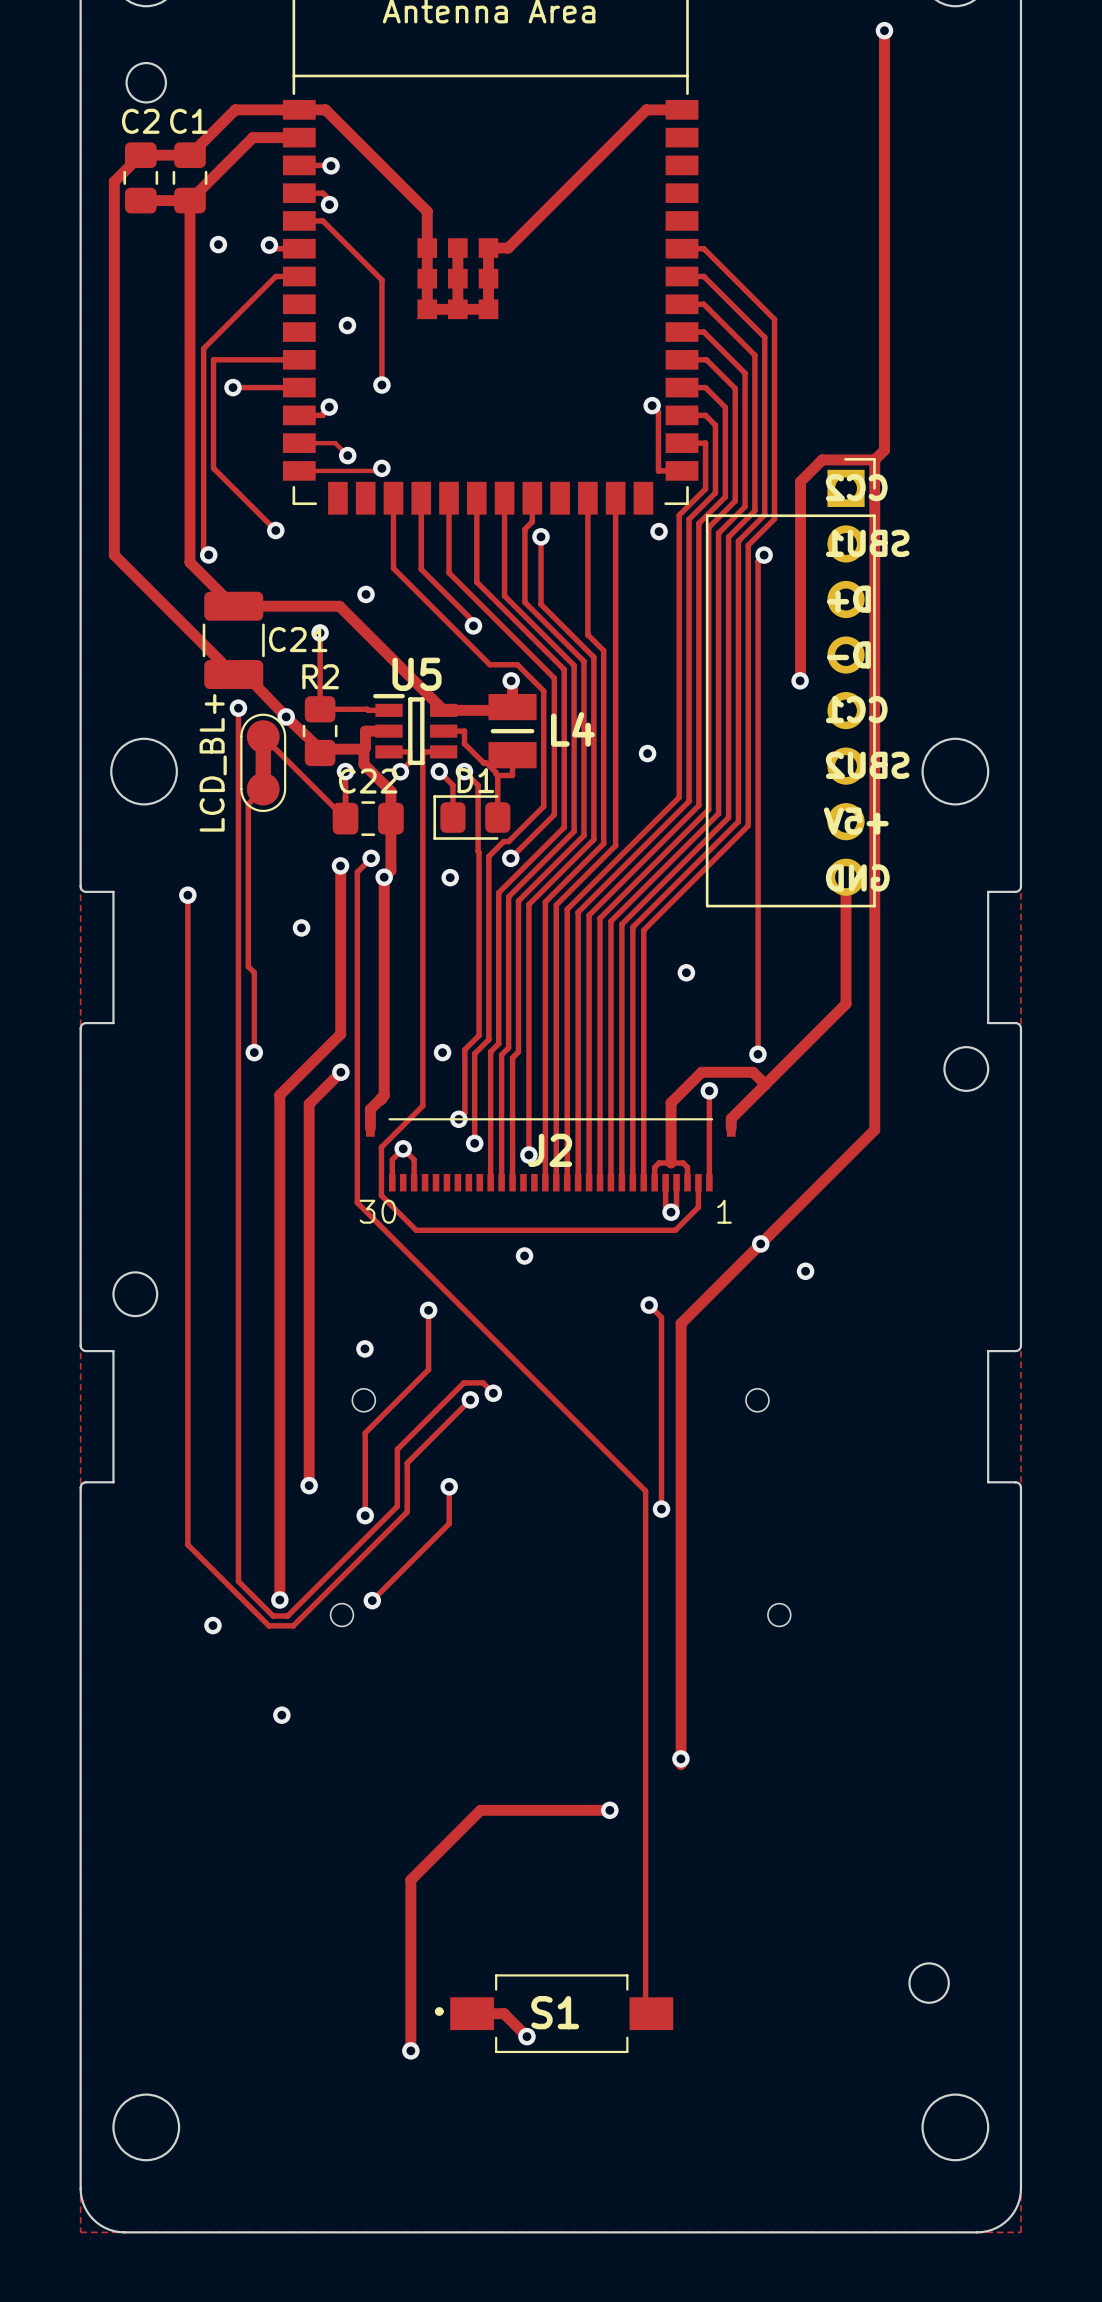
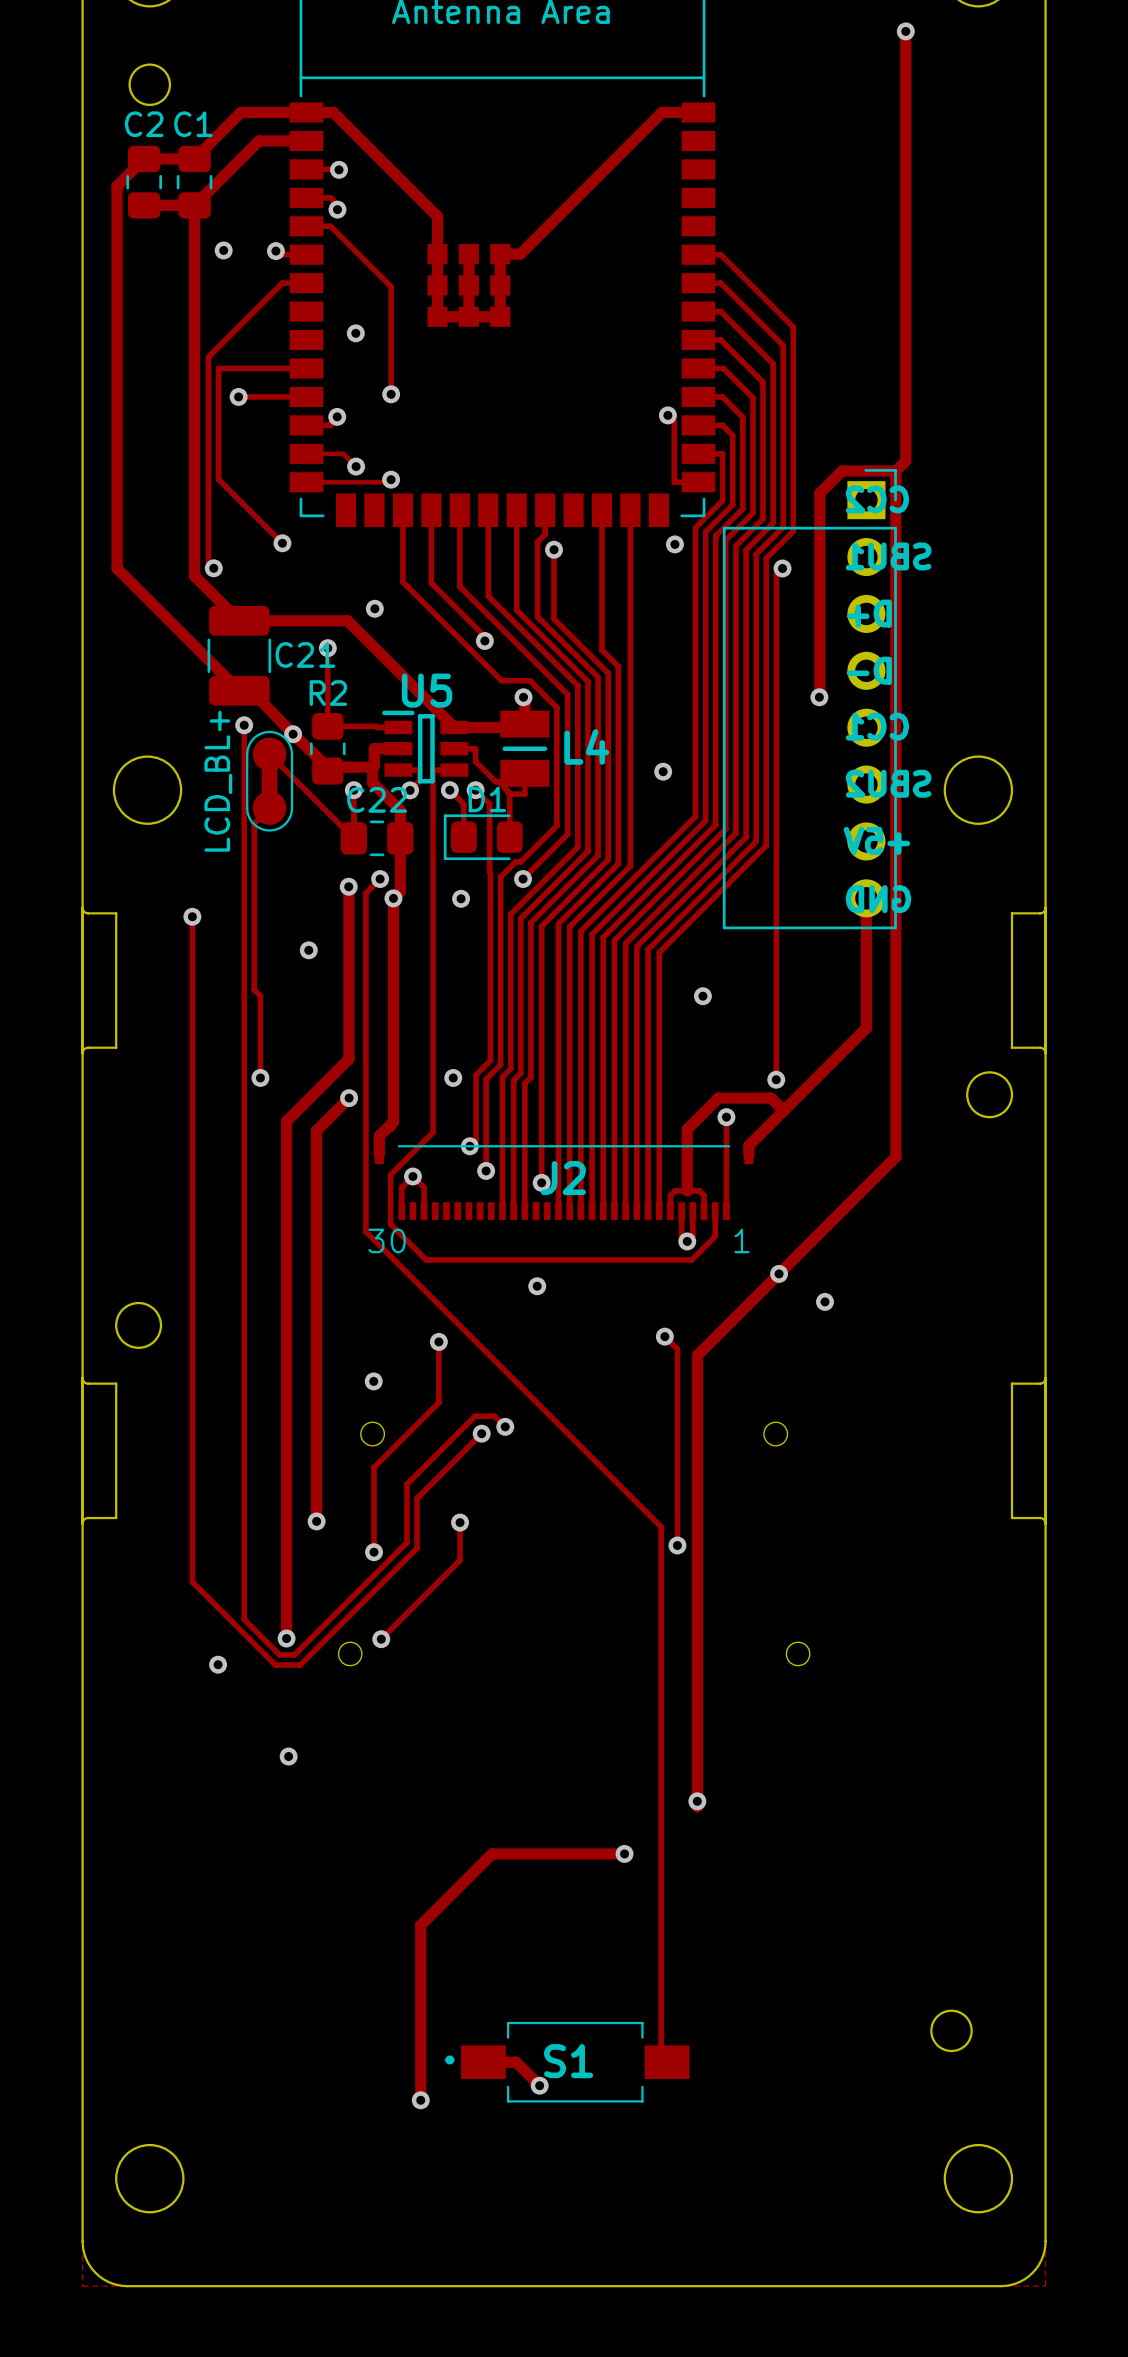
J2 footprint: [79, 885, 1023, 1489] -> [81, 906, 1047, 1525]
board edge: none -> (82, 907) (82, 1053)
board edge: none -> (1045, 907) (1045, 1053)
board edge: none -> (82, 1378) (82, 1523)
board edge: none -> (1045, 1378) (1045, 1523)

